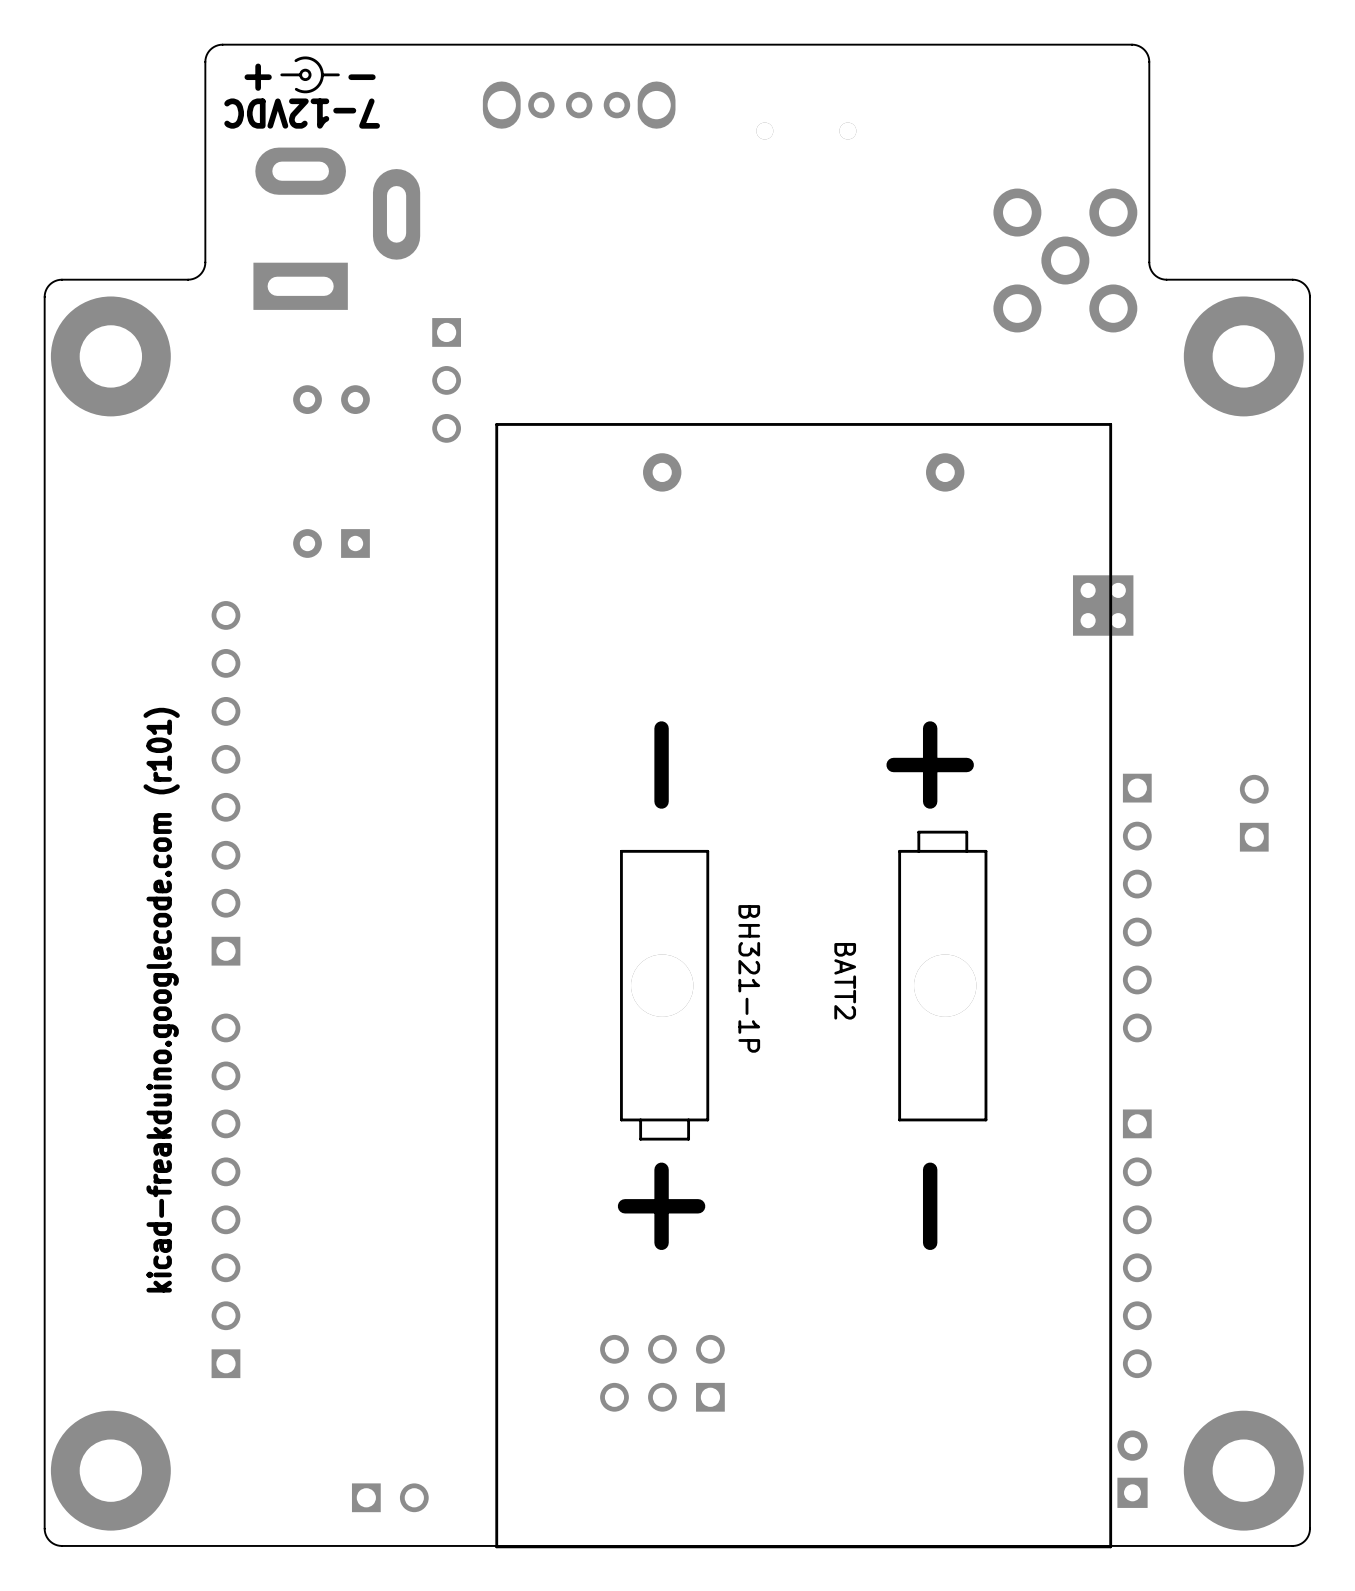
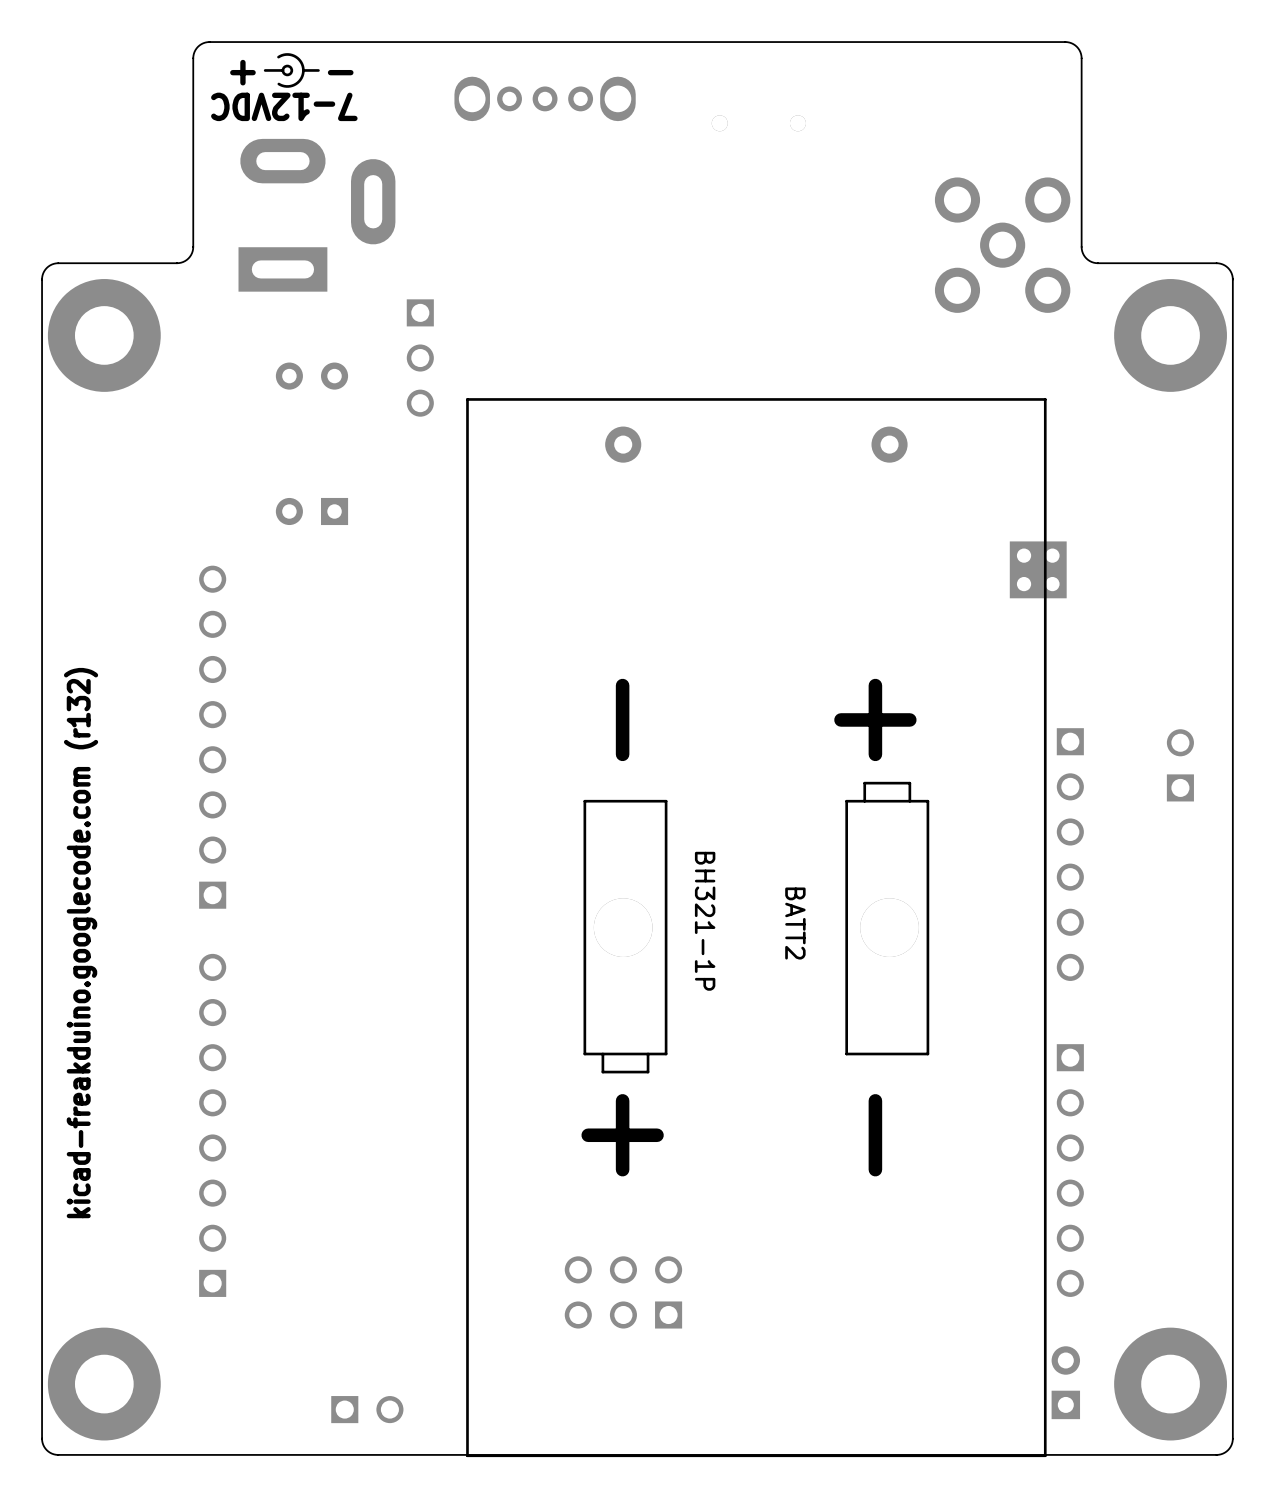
text: kicad-freakduino.googlecode.com (r101) (161, 1000) -> none
text: none -> kicad-freakduino.googlecode.com (r132) (81, 943)

